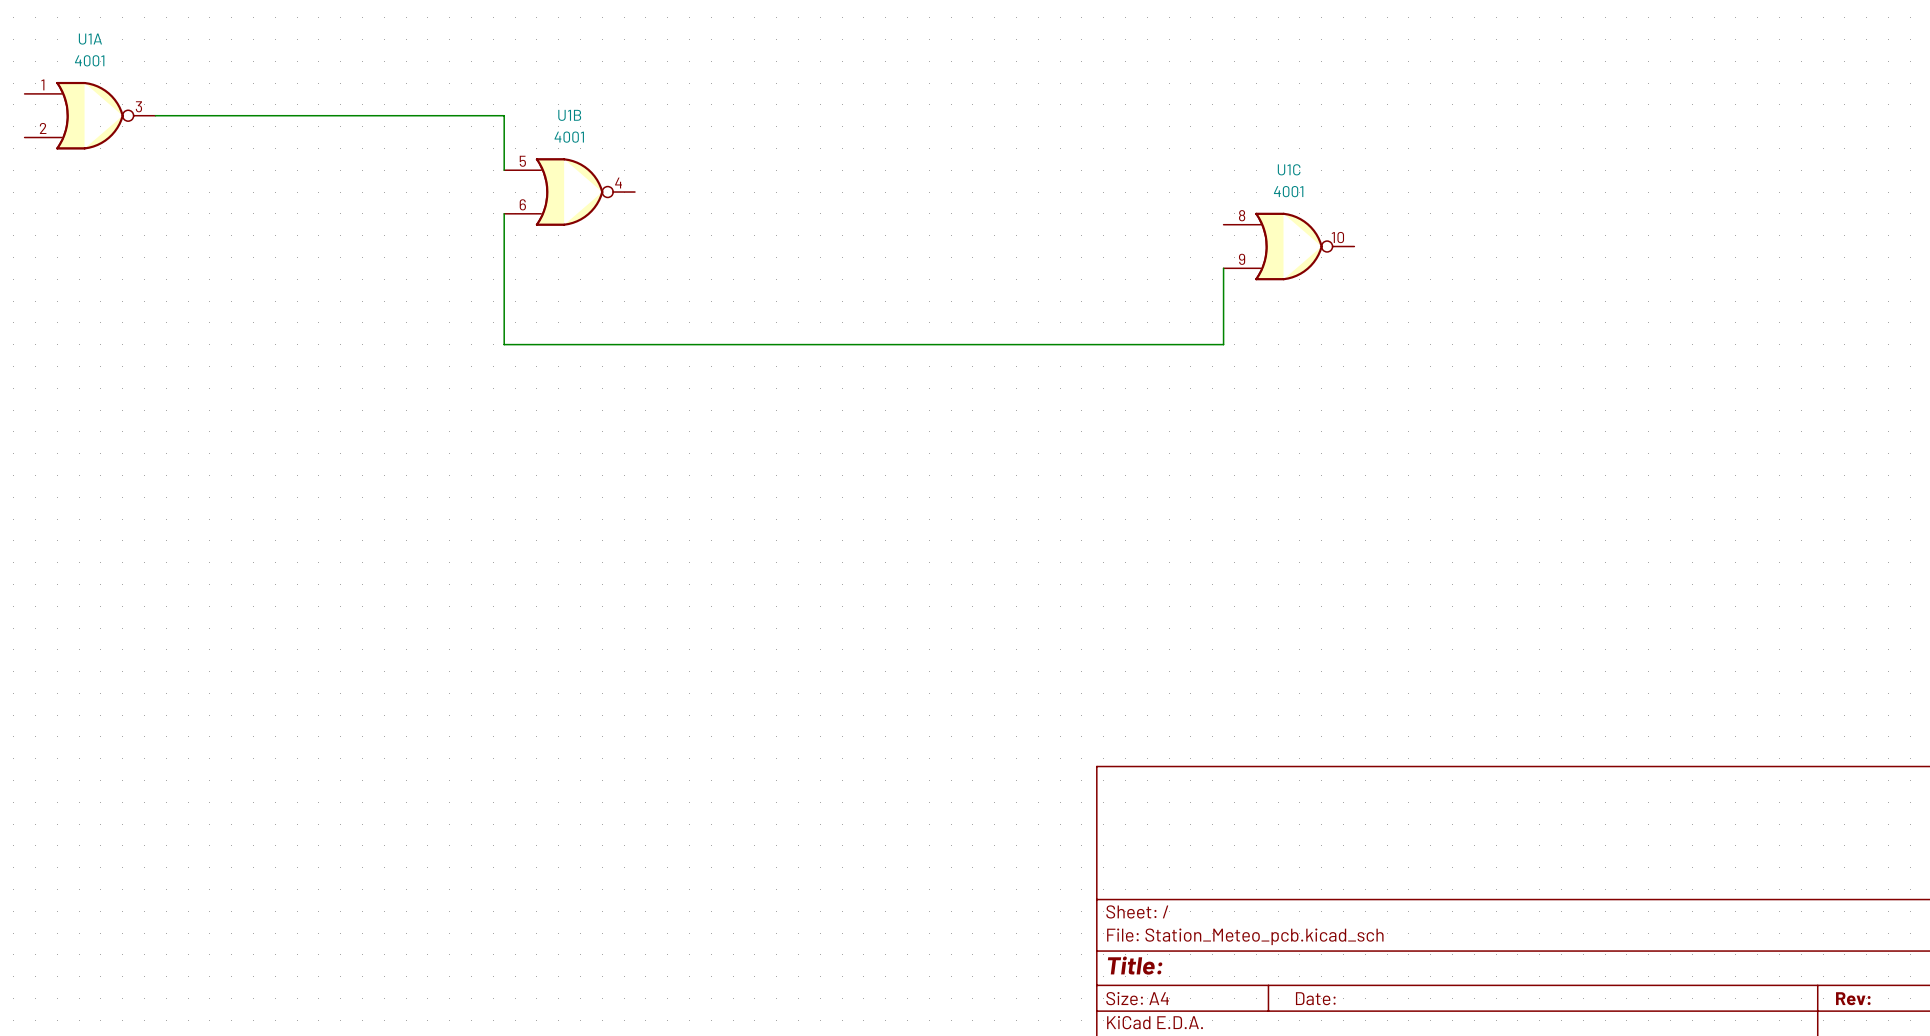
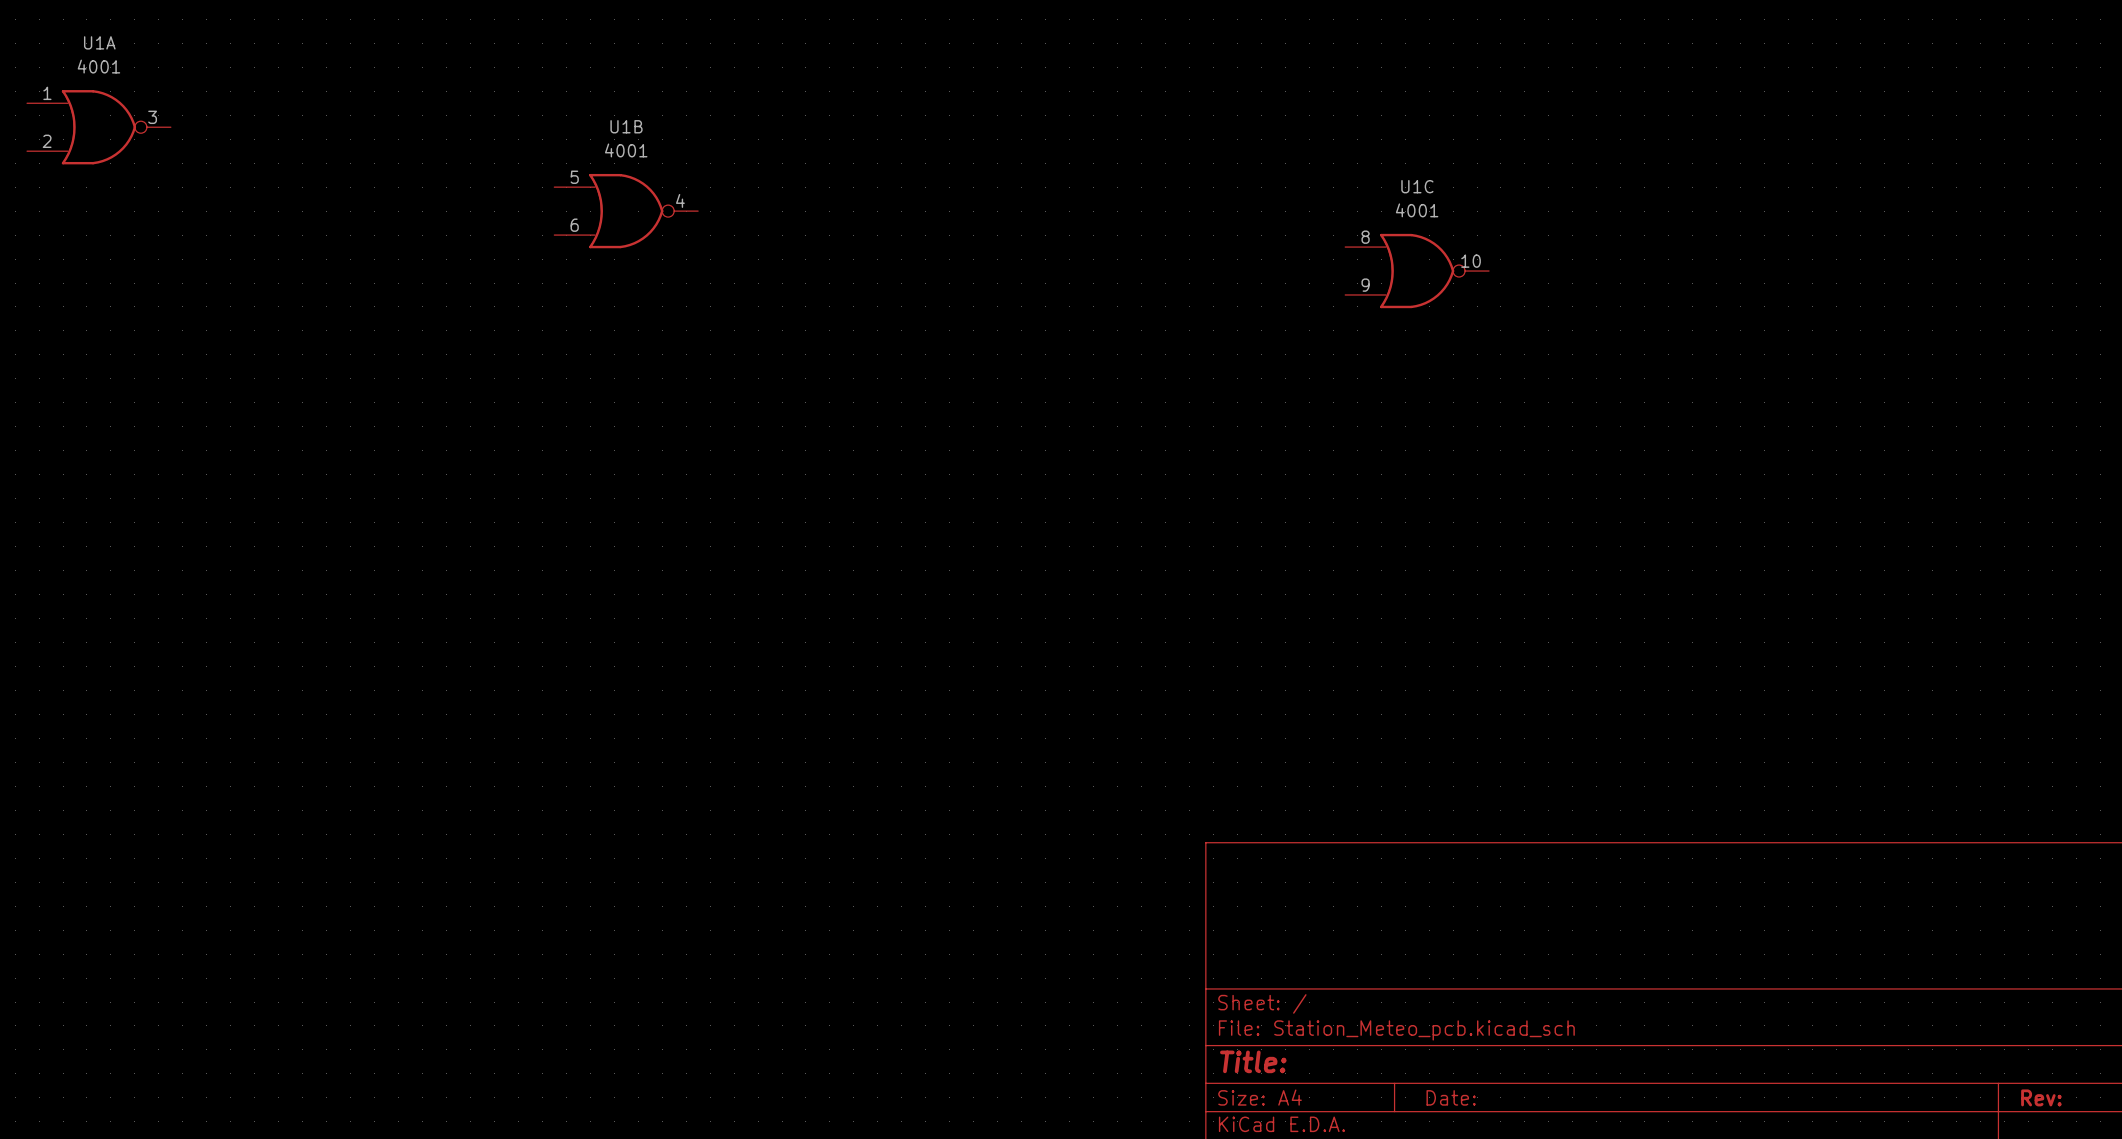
wire: (155, 115) (504, 115) (504, 170) -> none
wire: (504, 213) (504, 344) (1223, 344) (1223, 268) -> none

